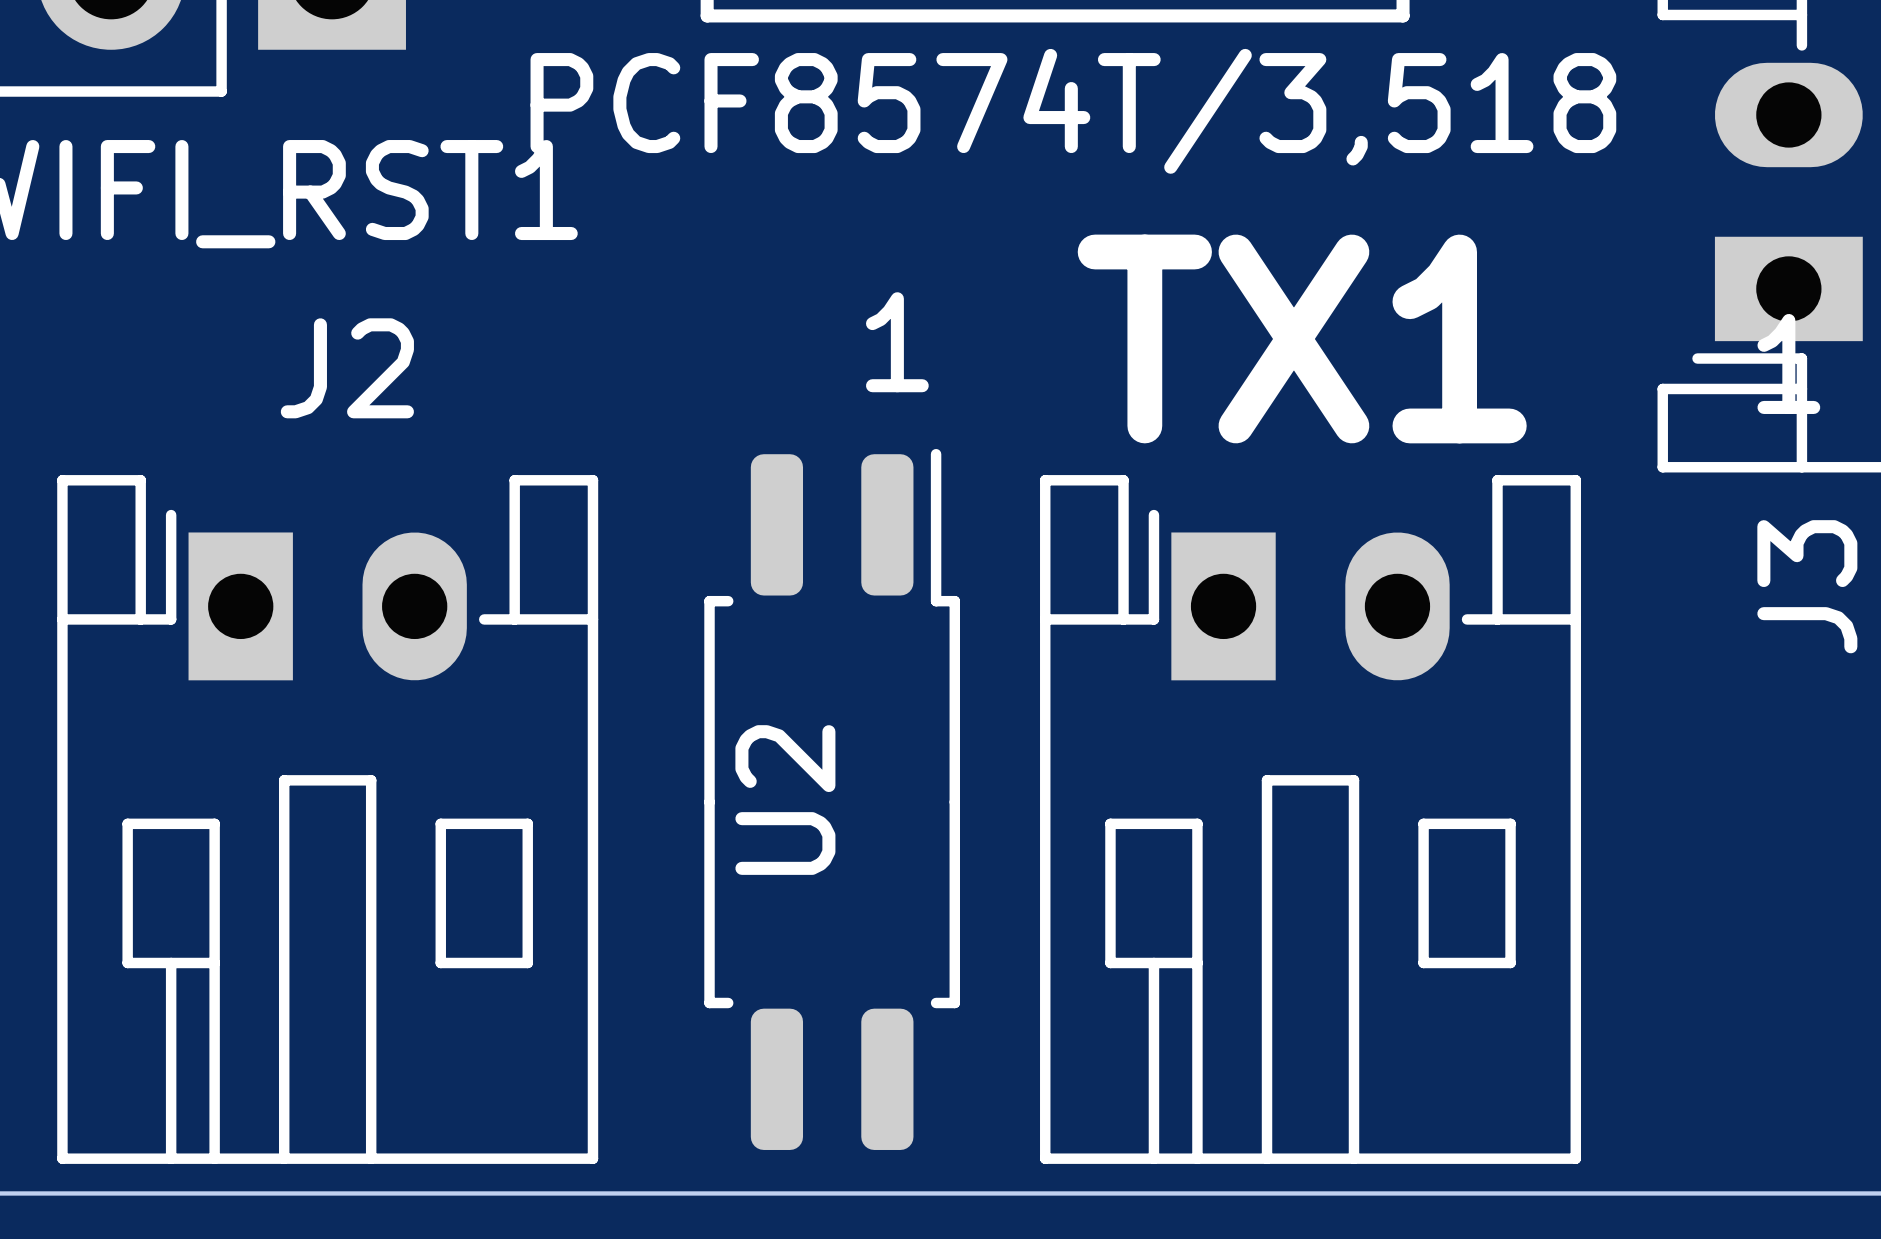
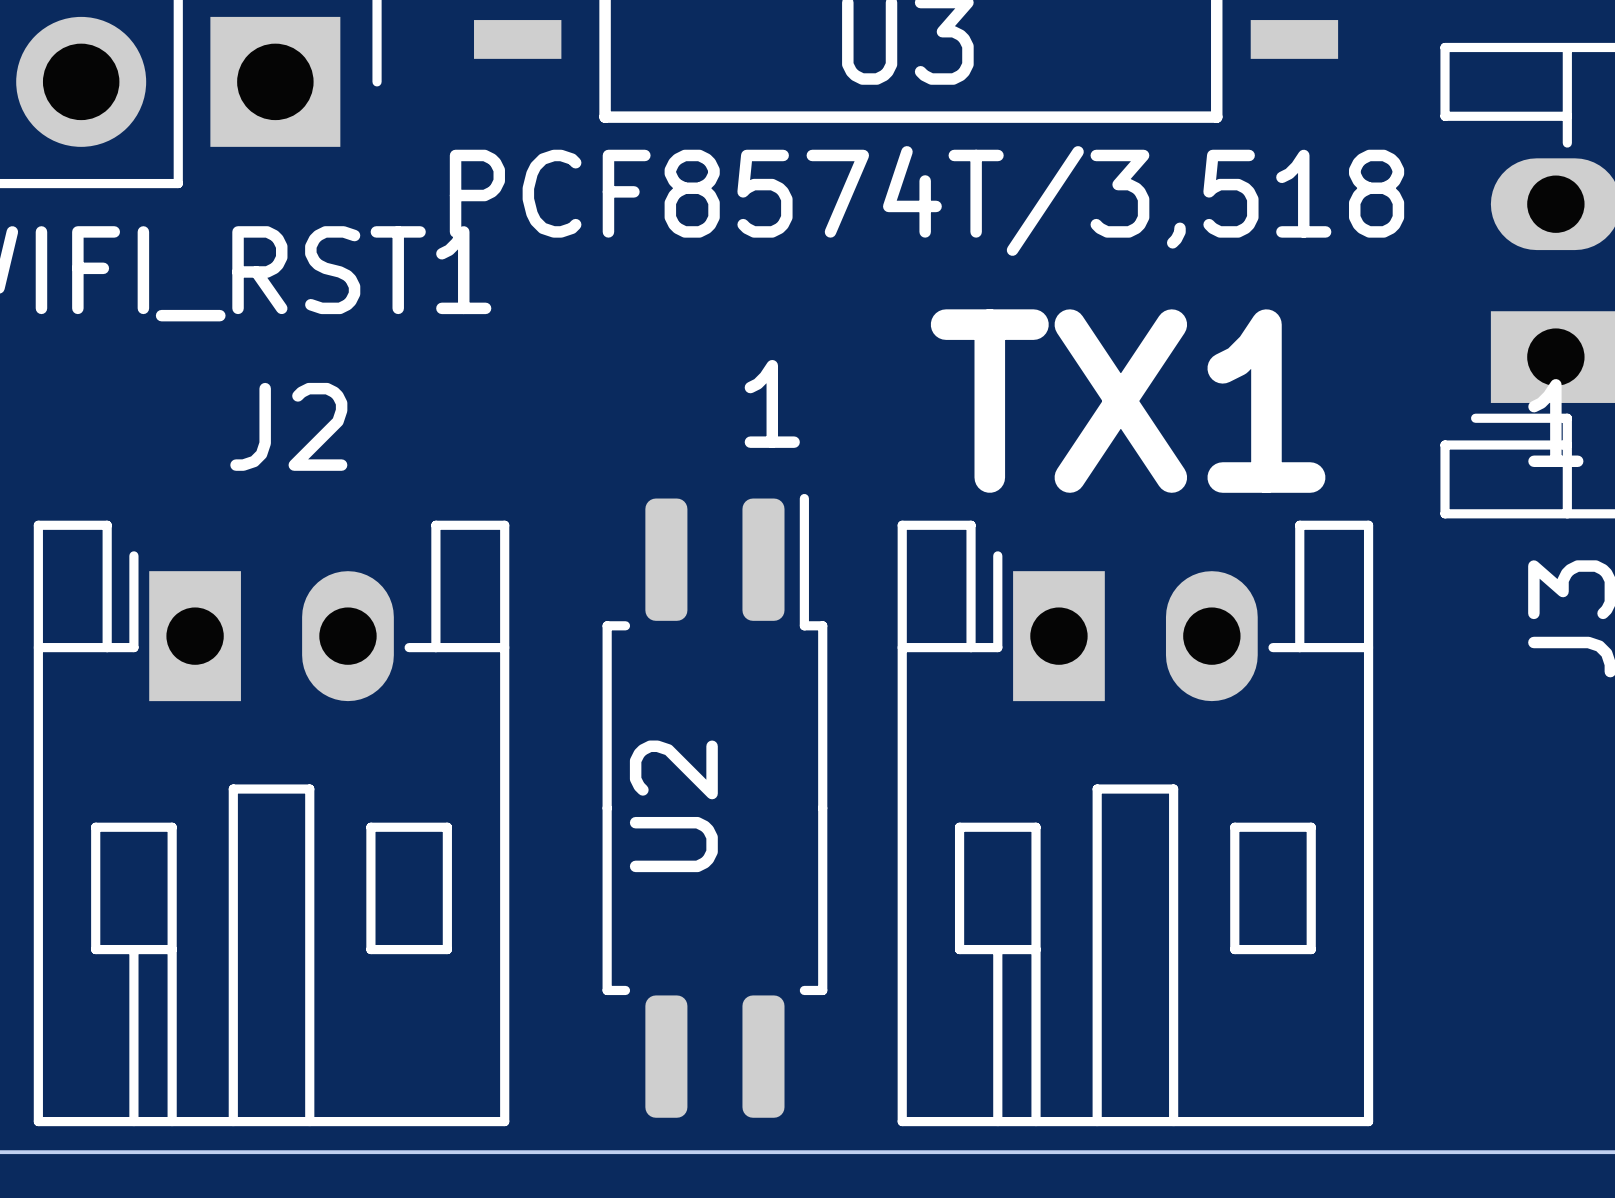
U2 footprint: [704, 448, 961, 1150] -> [602, 493, 828, 1118]

